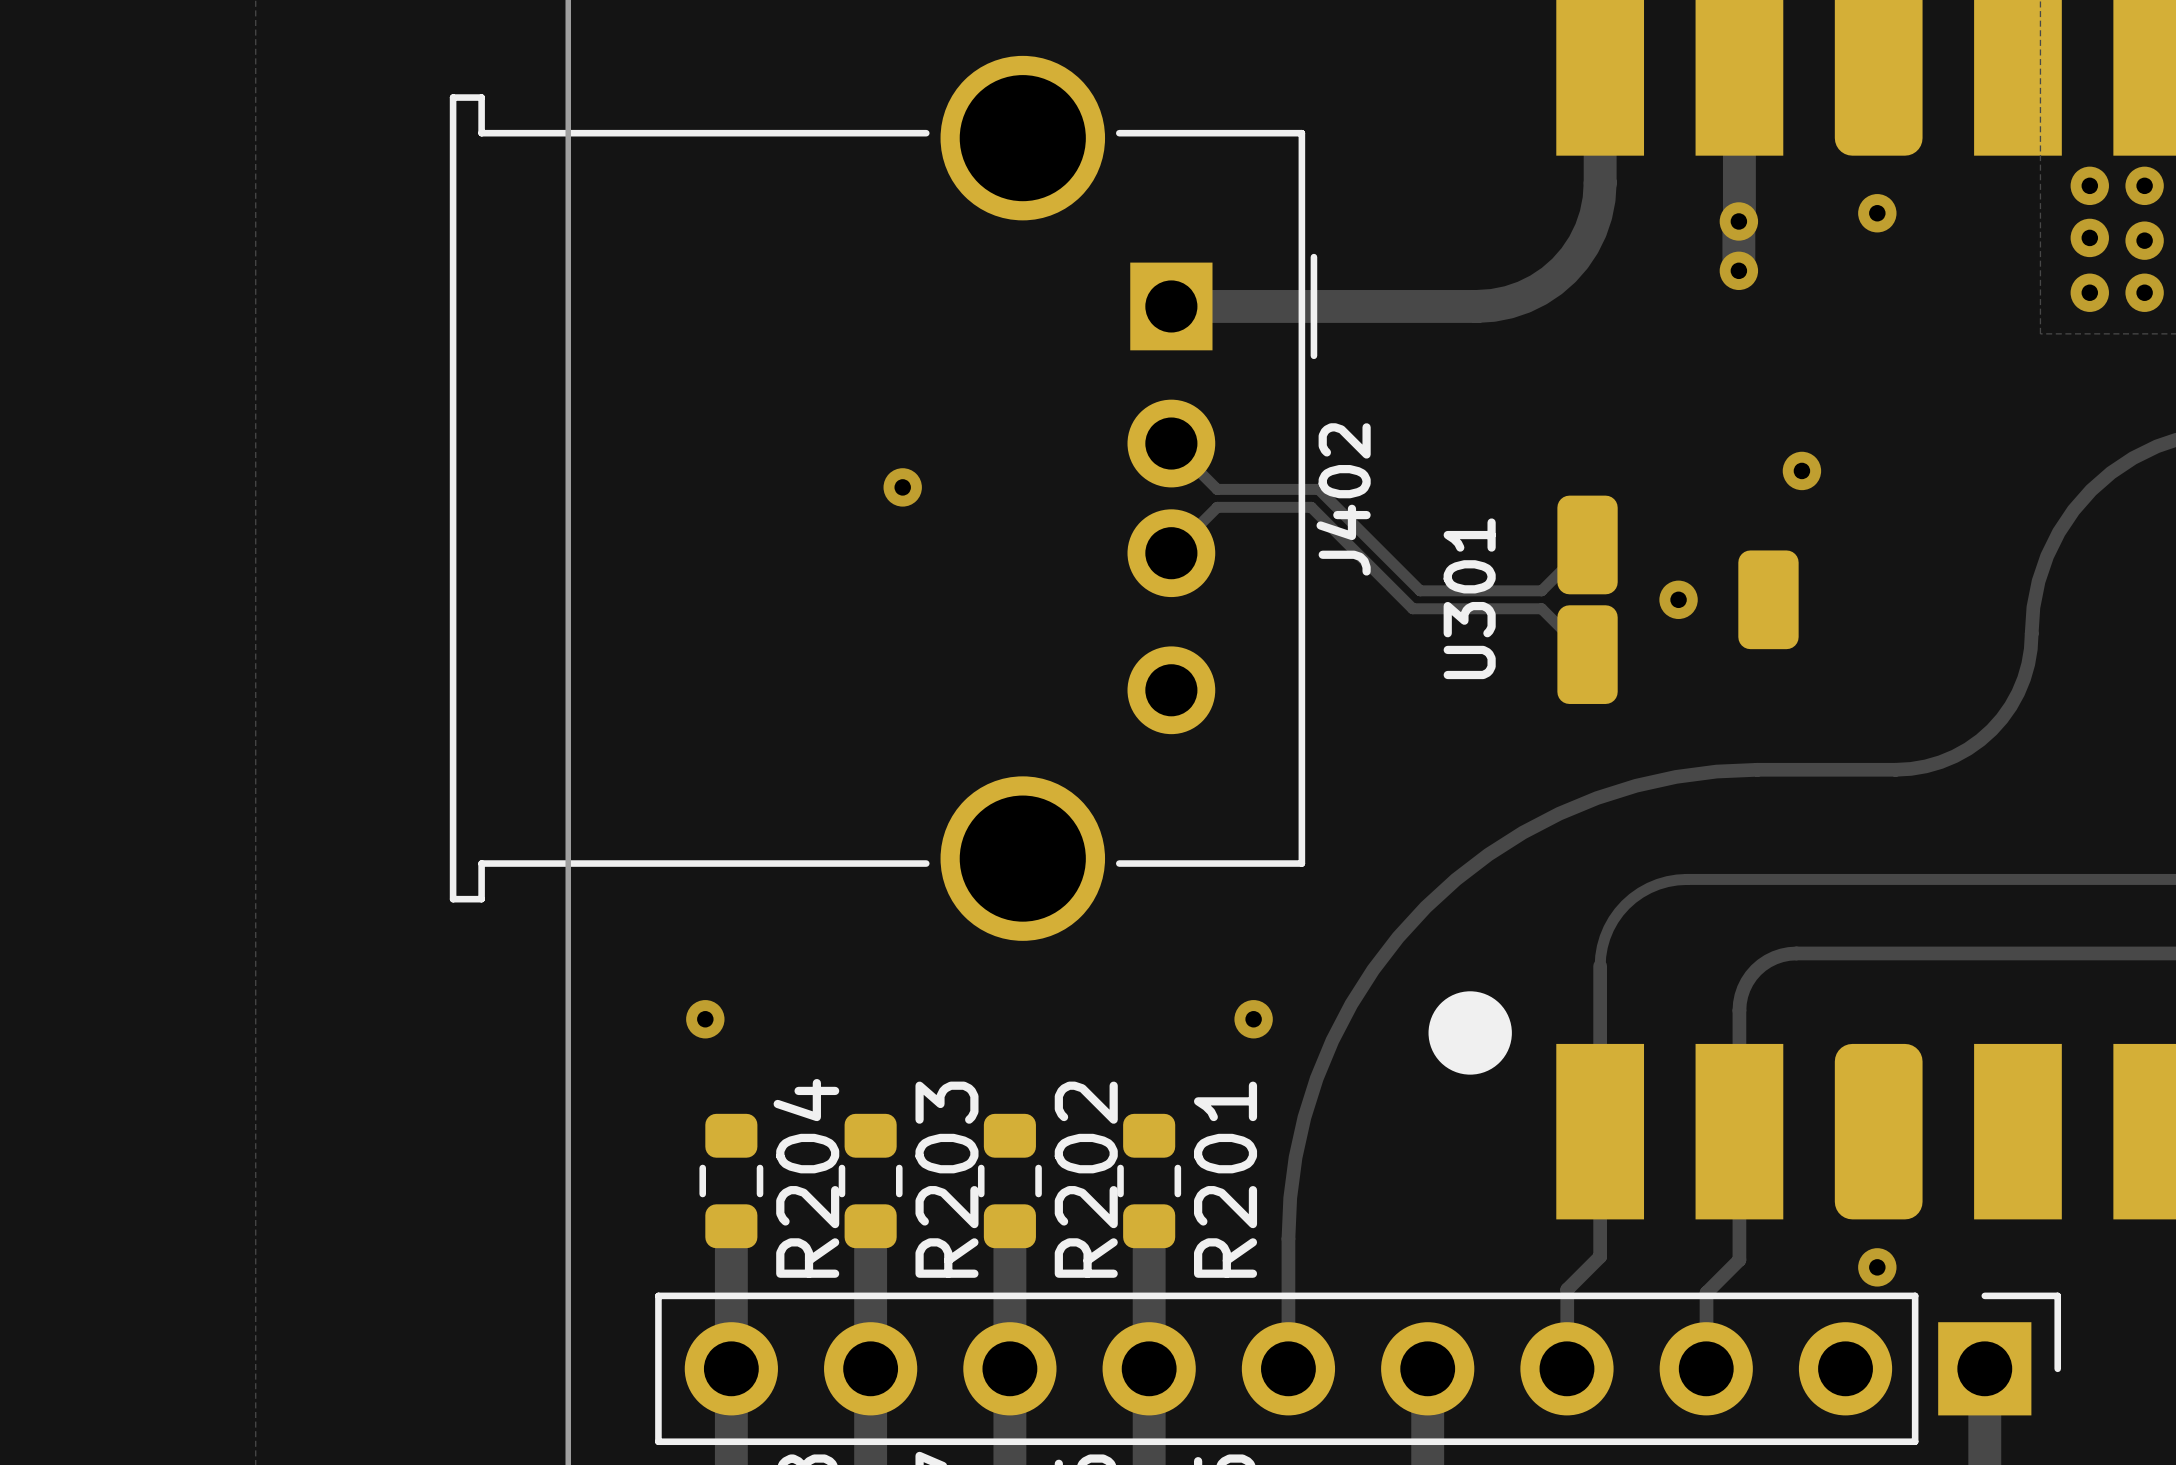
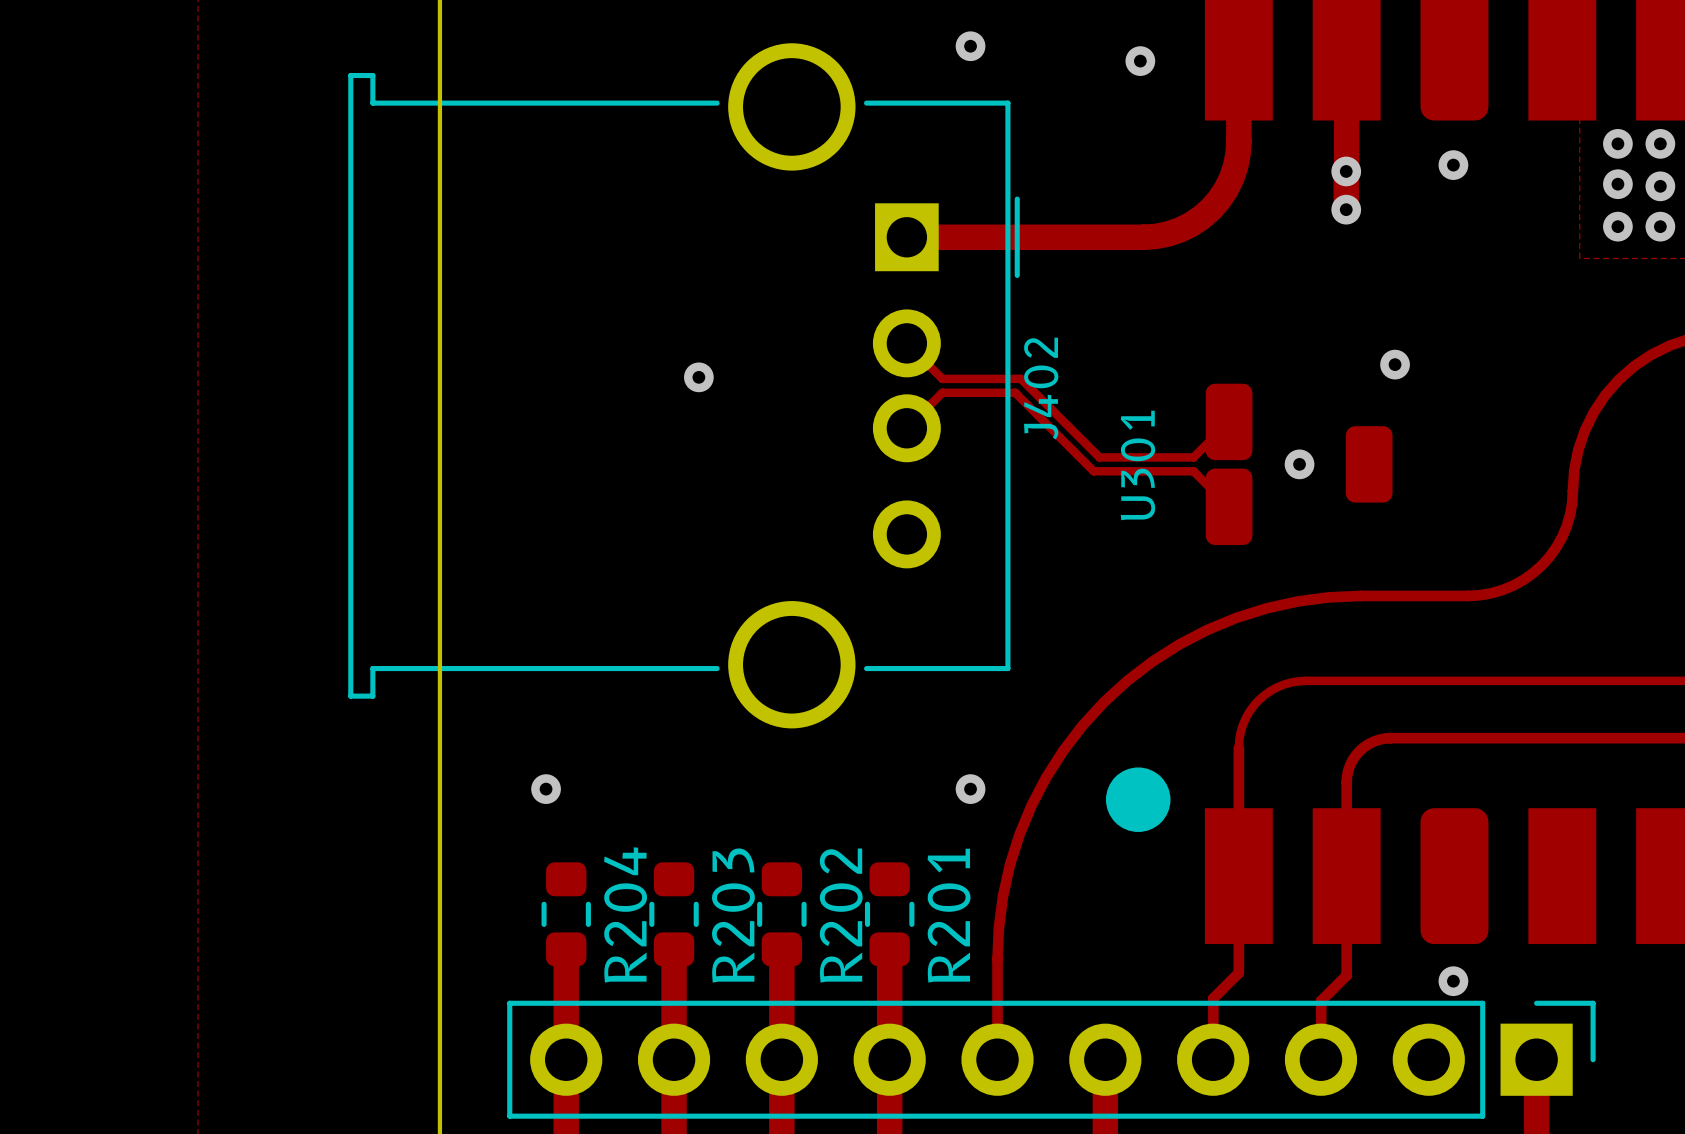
via: none -> (970, 46)
via: none -> (1140, 61)

